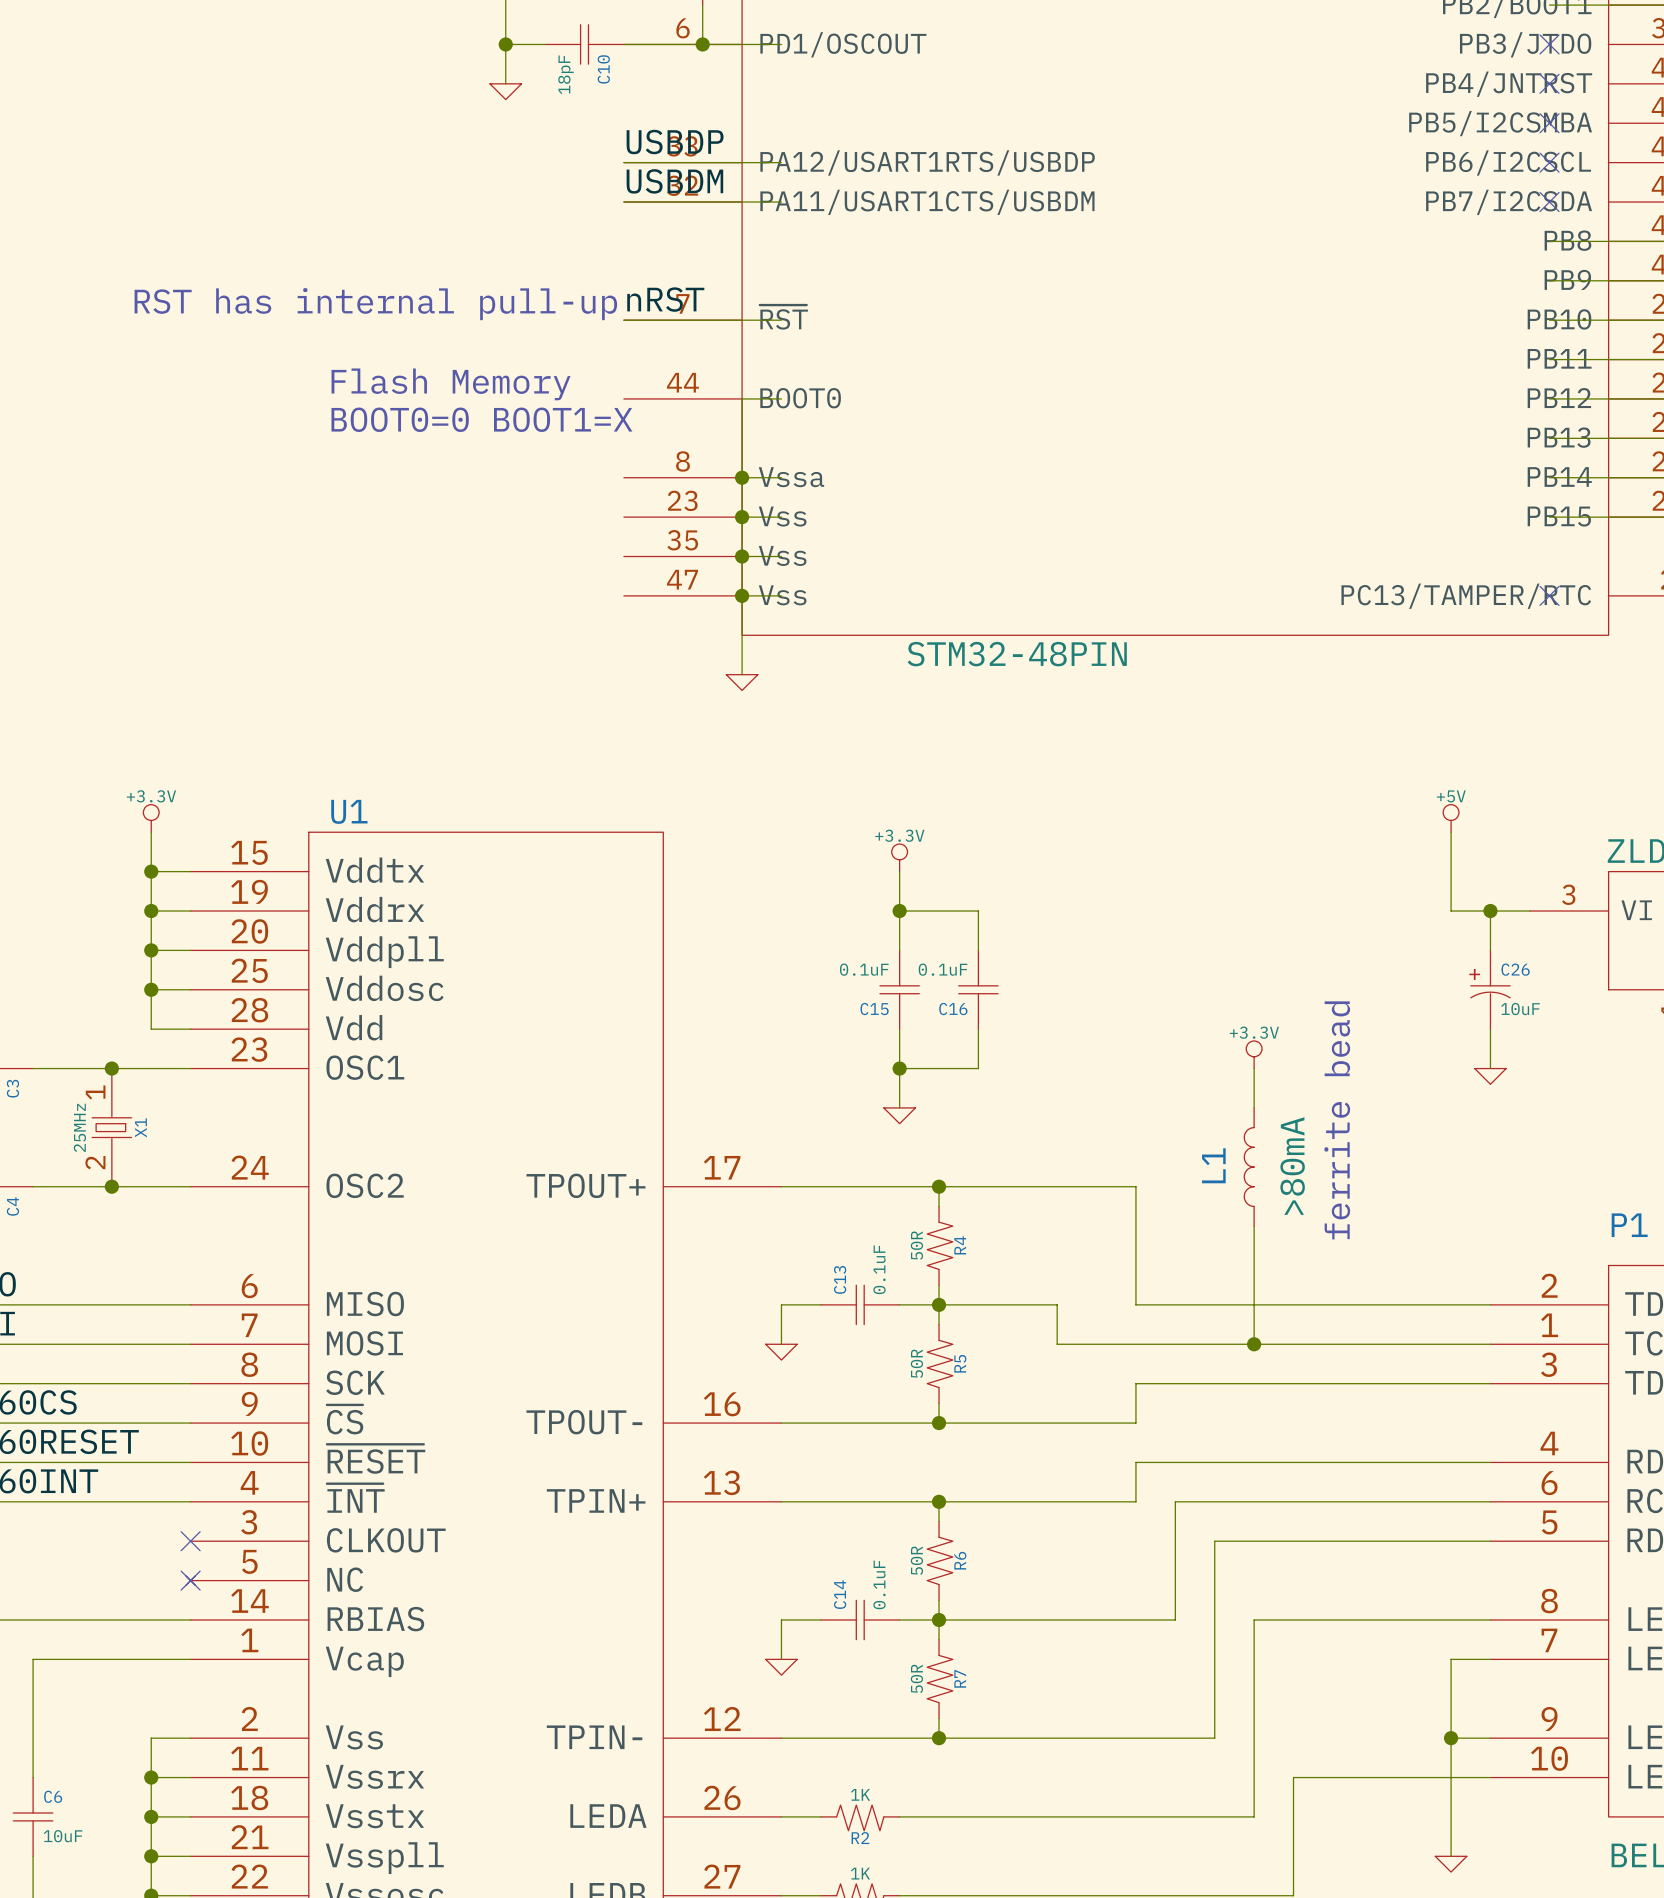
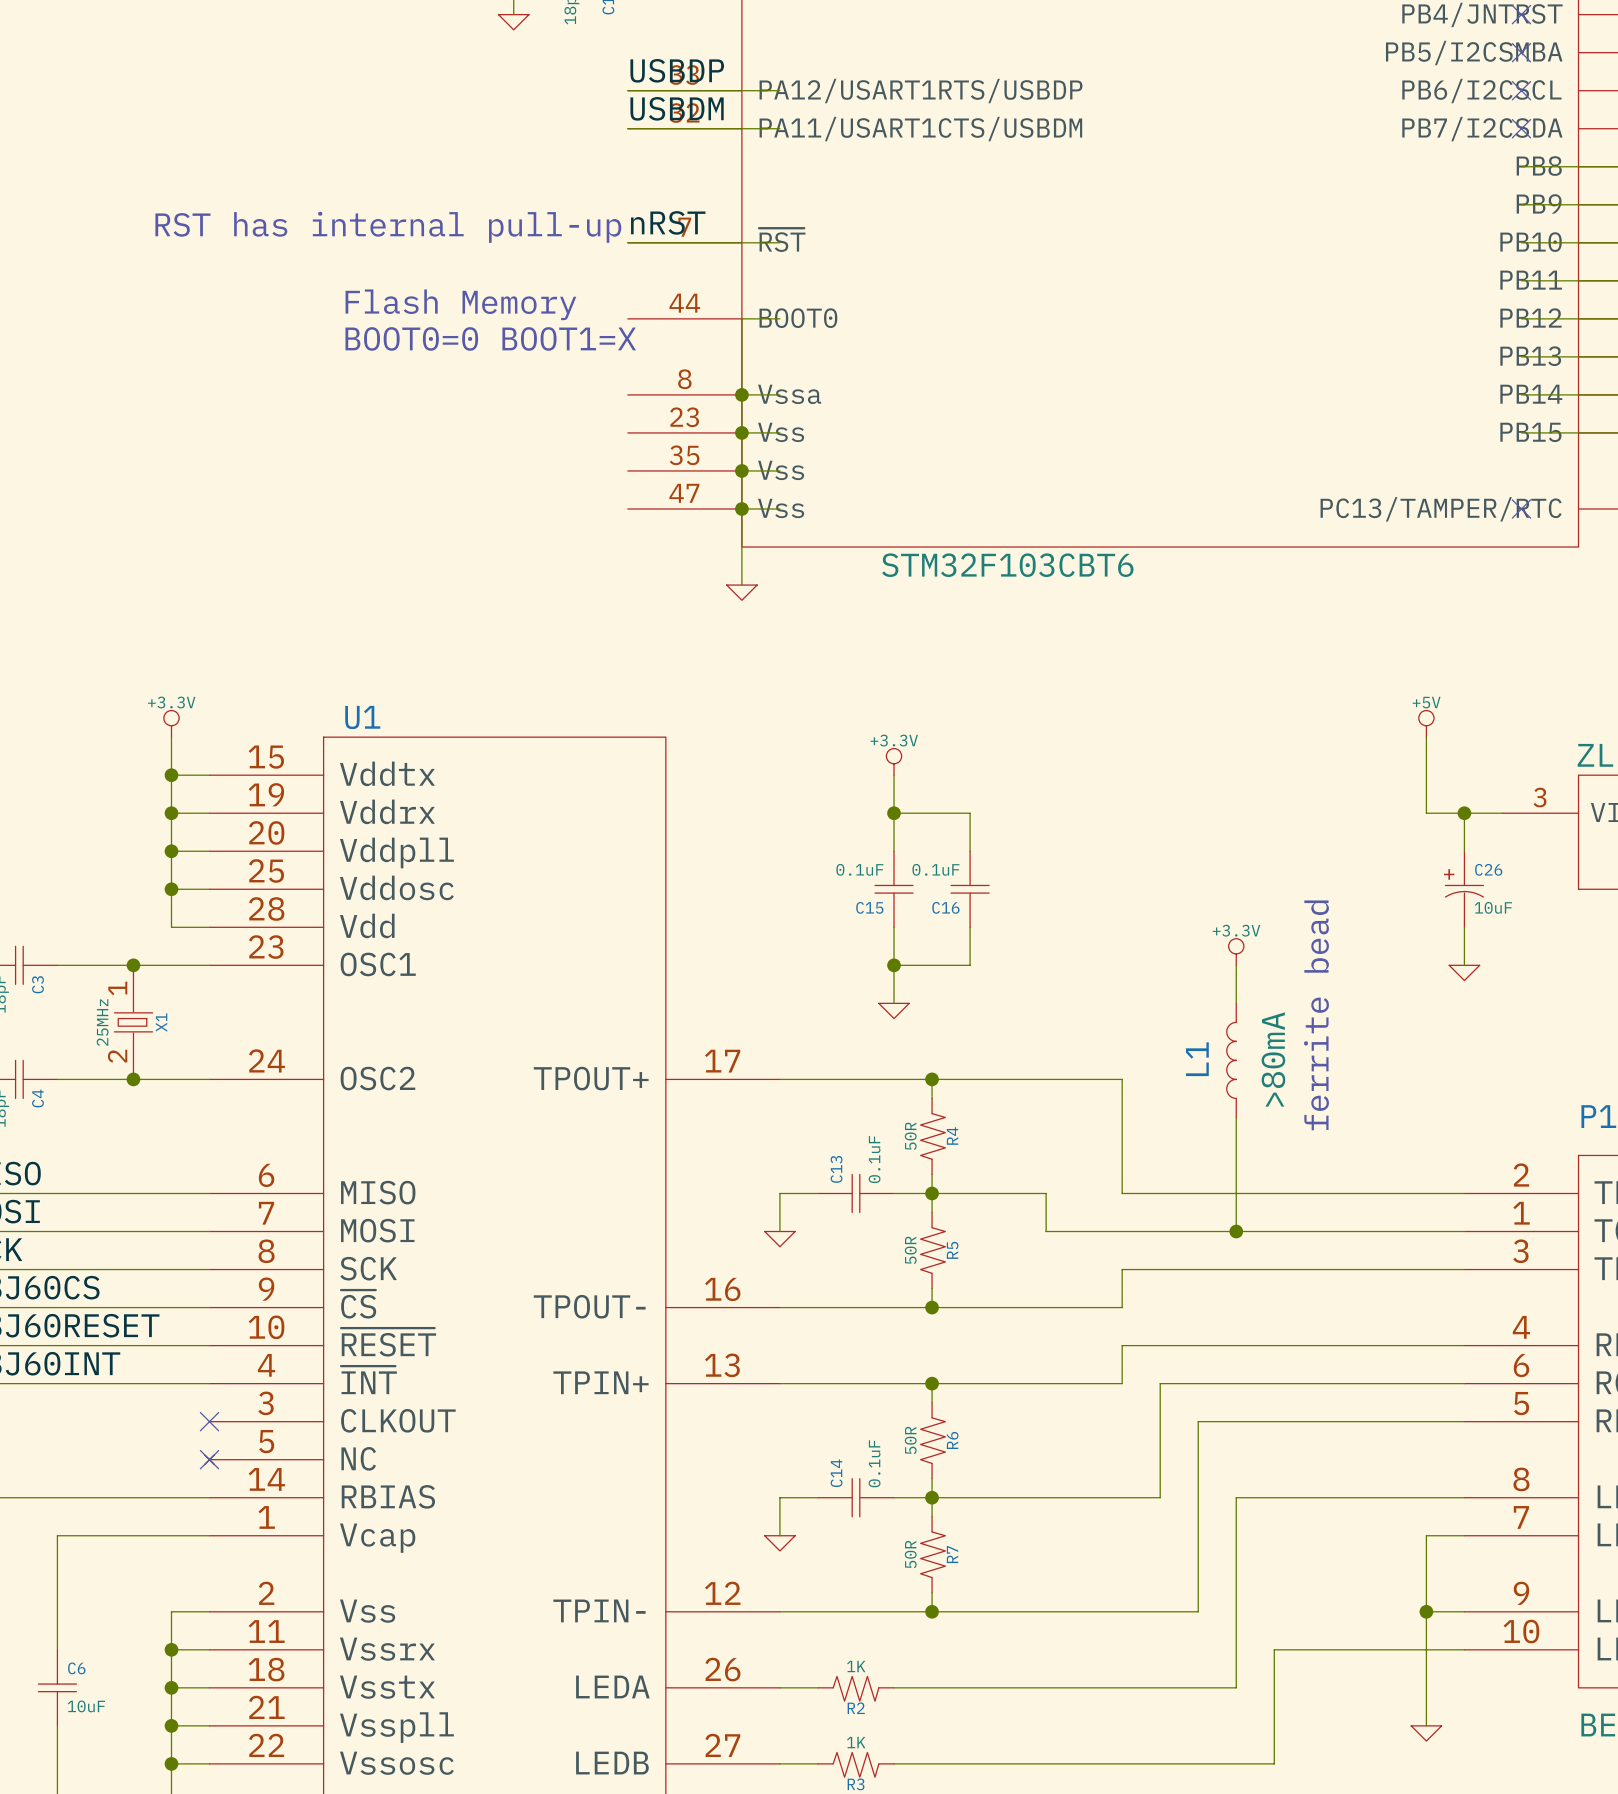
part value: STM32-48PIN (1017, 654) -> STM32F103CBT6 (1007, 565)

